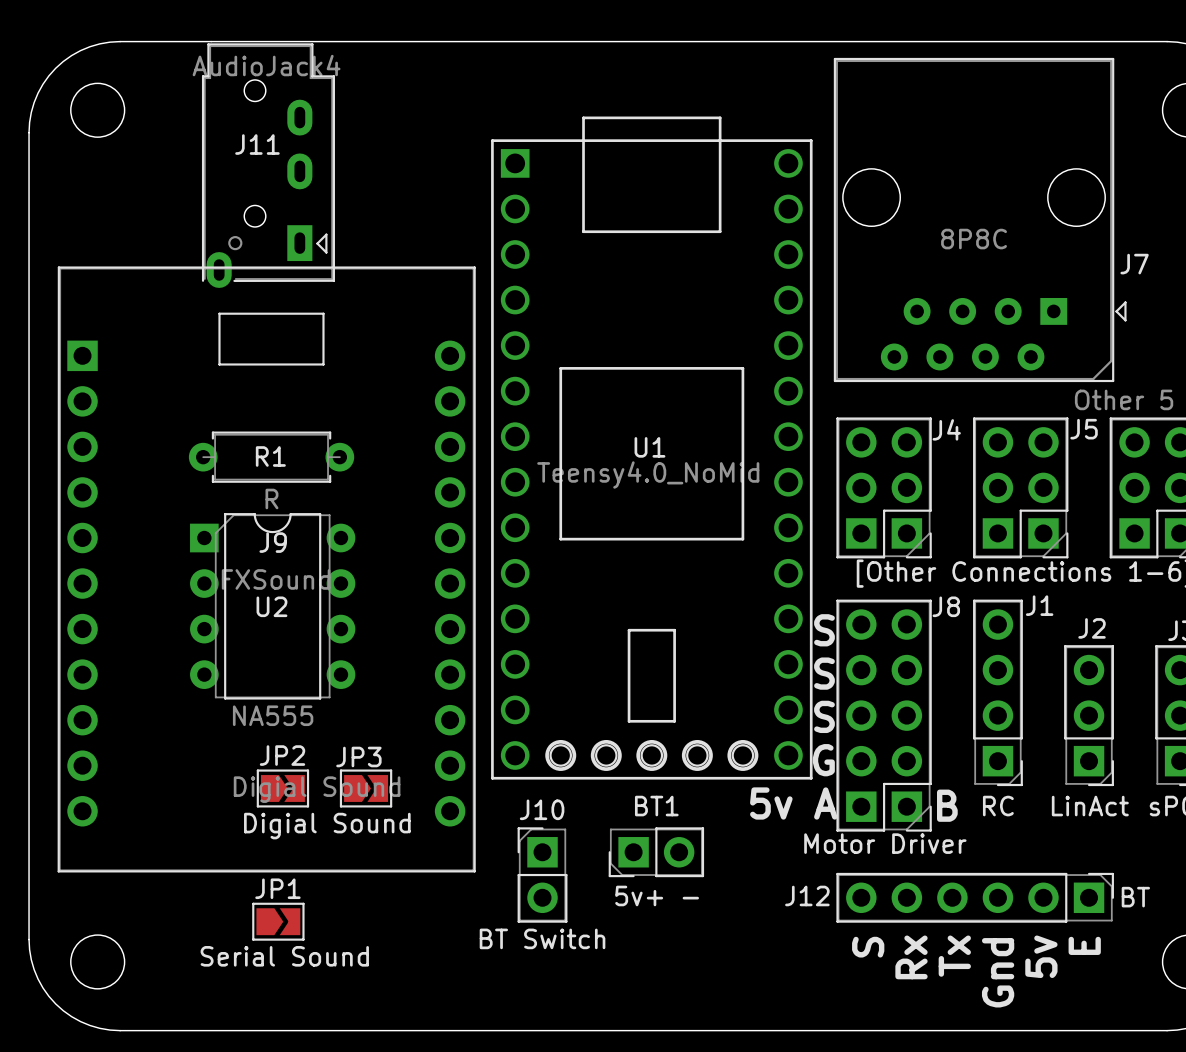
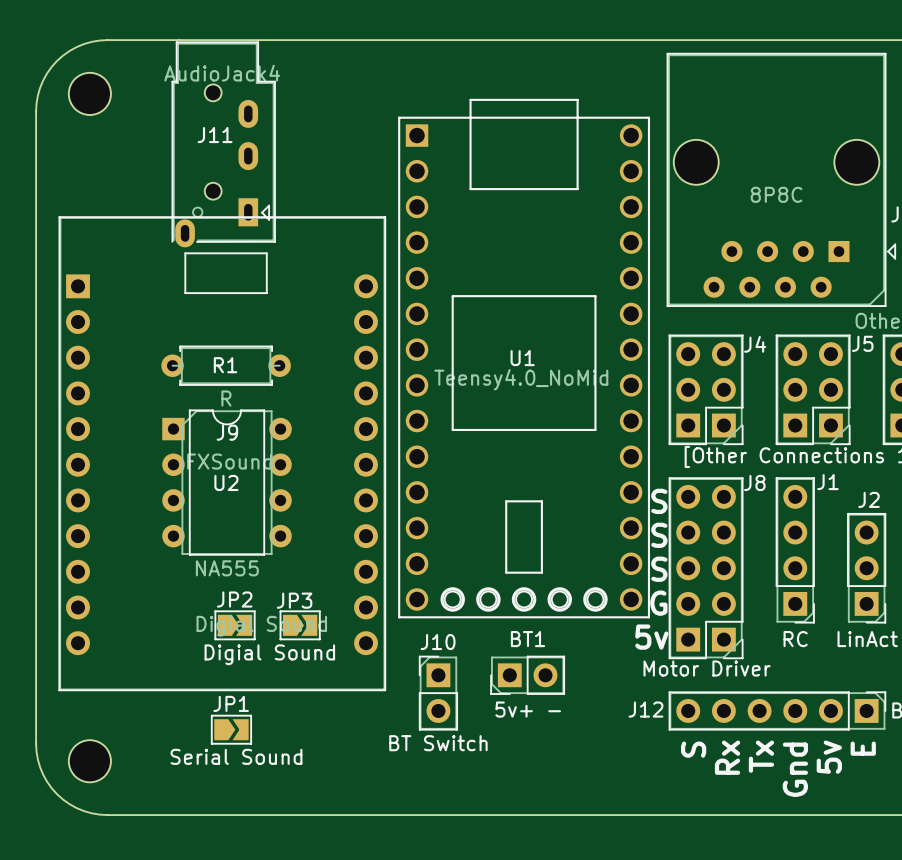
J11 footprint: [201, 43, 336, 288] -> [171, 41, 276, 248]
text: 5v A (793, 803) -> 5v (651, 637)
text: B (947, 805) -> none

